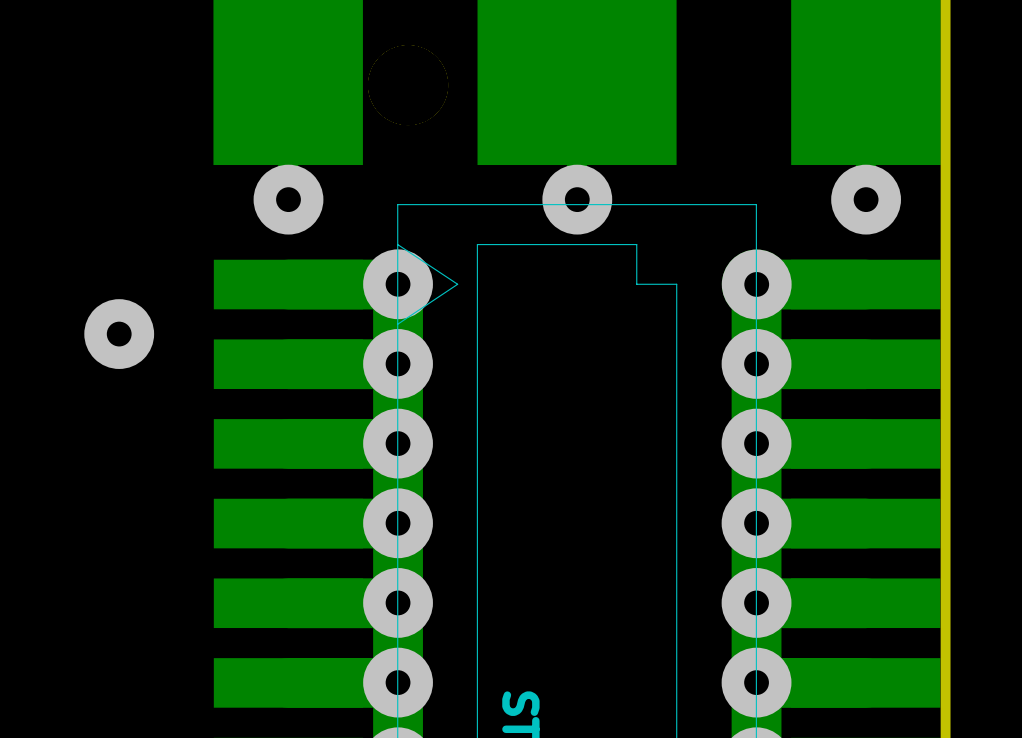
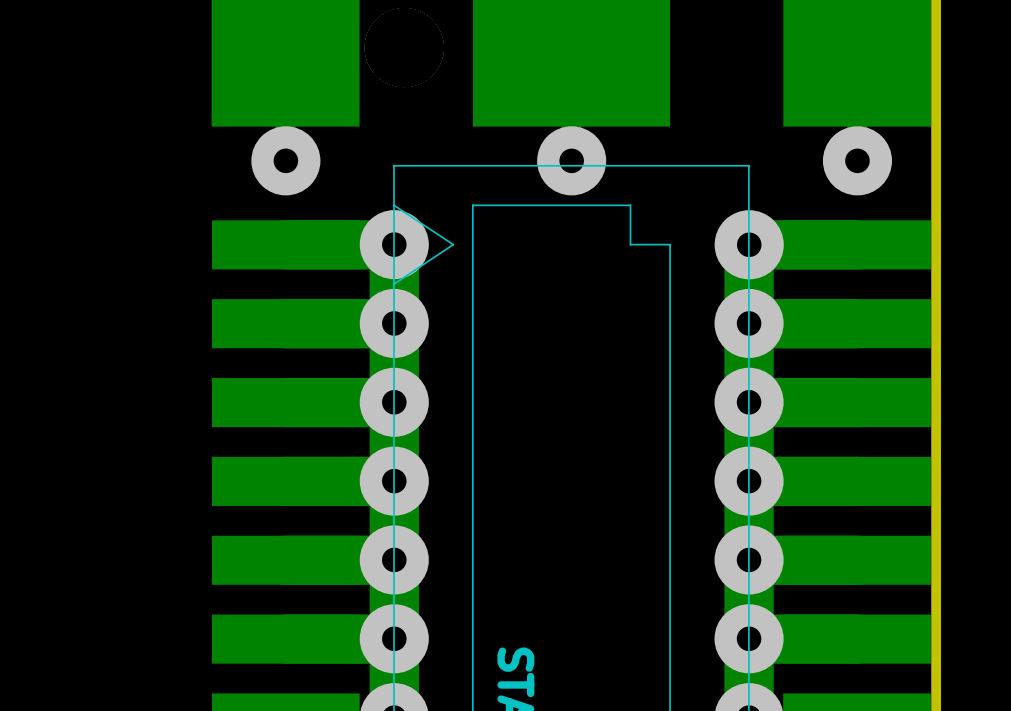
via: (119, 334) -> none

